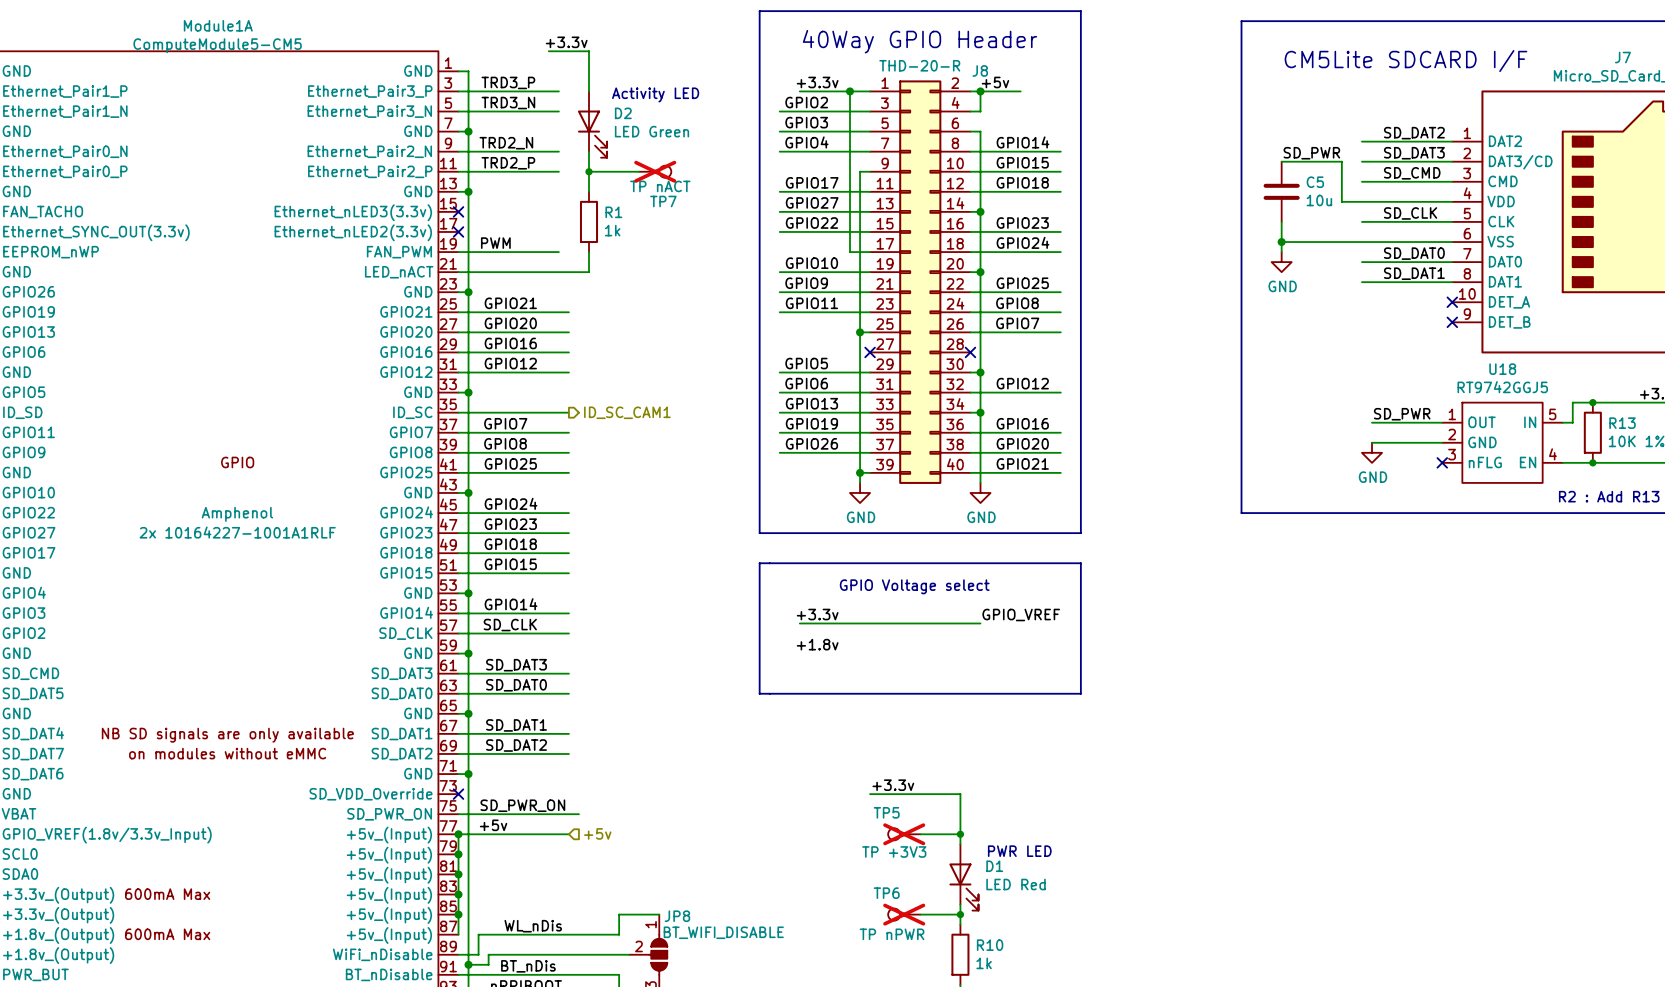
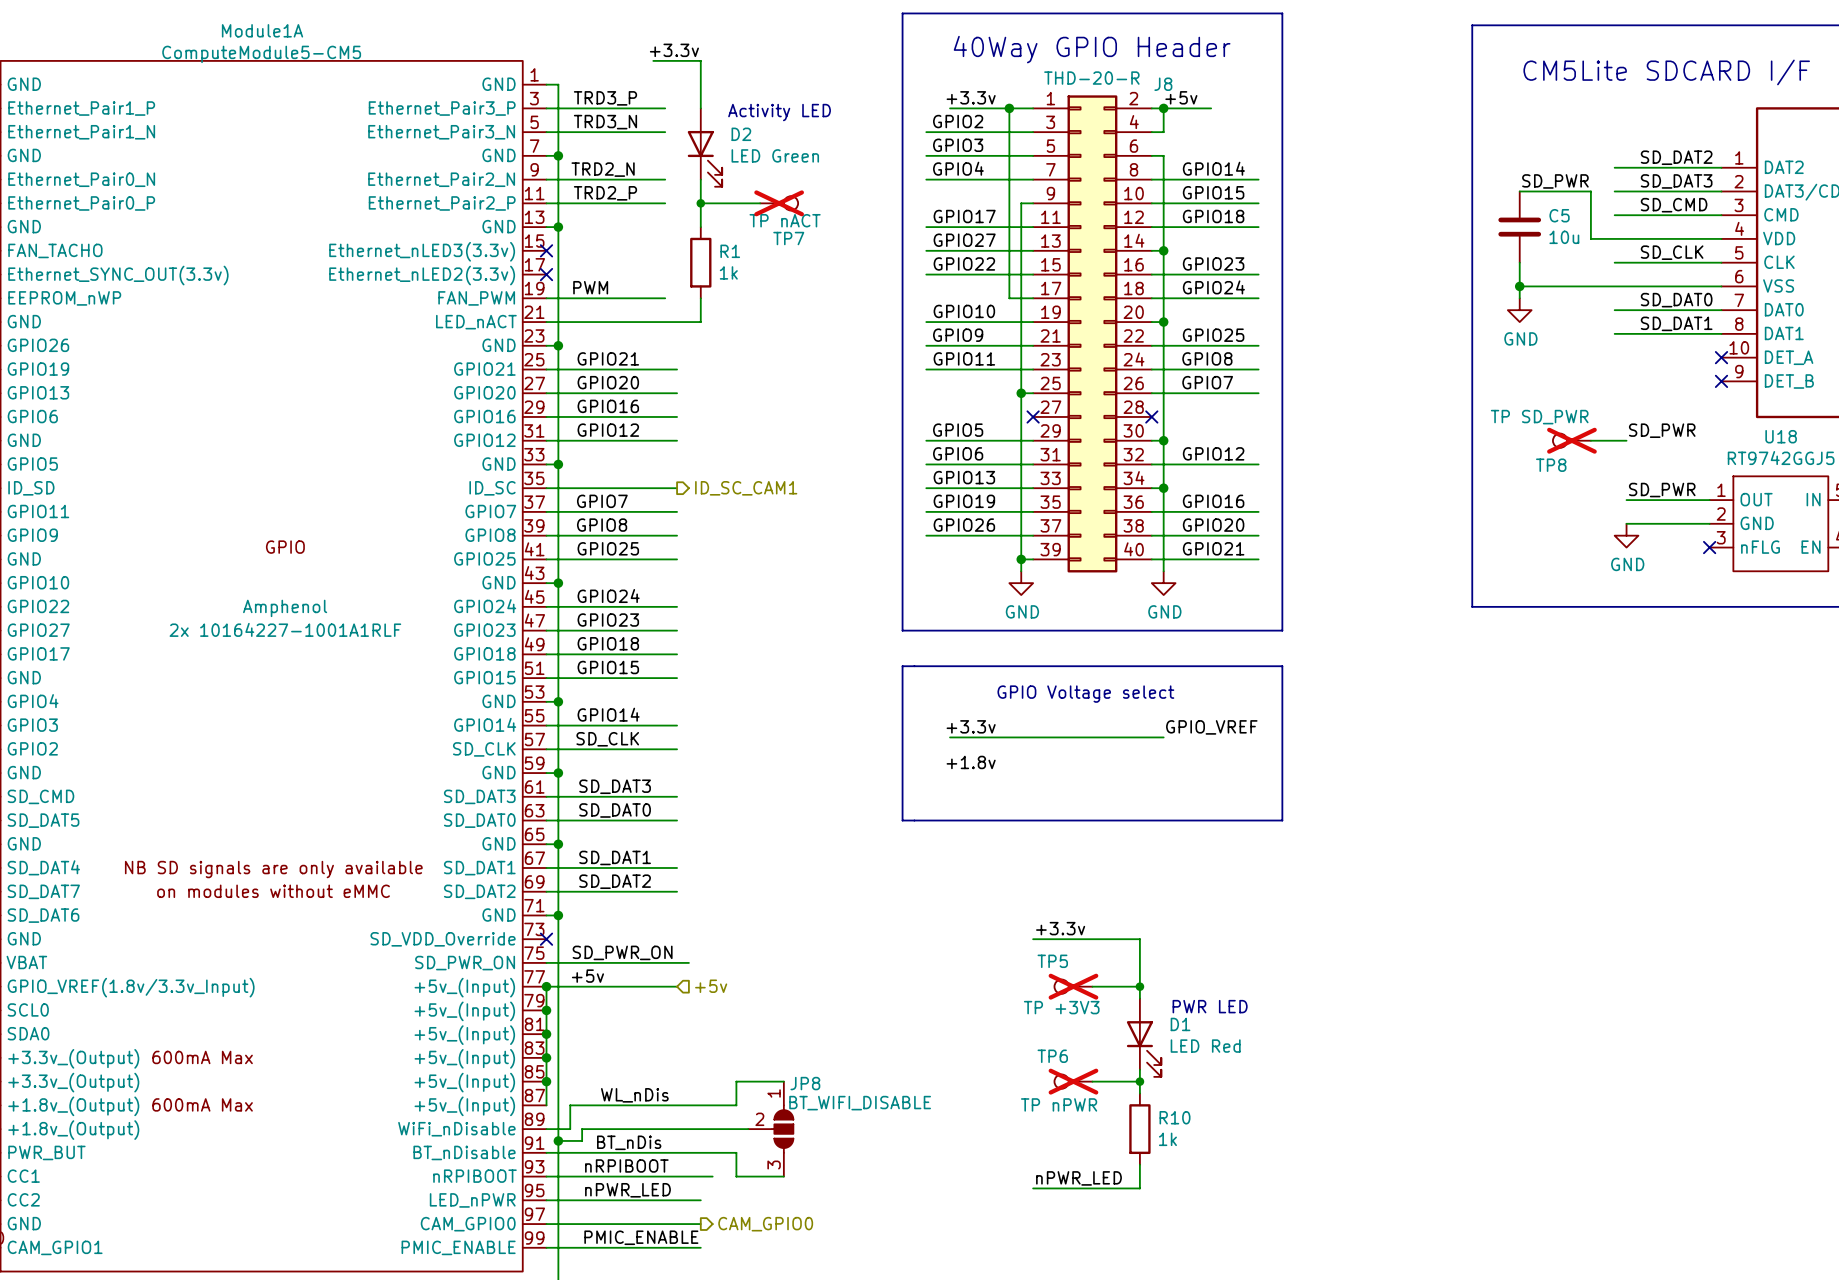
label: none -> SD_PWR (1662, 430)
TP8: none -> TP SD_PWR (1571, 440)
wire: none -> (1590, 440) (1626, 440)

